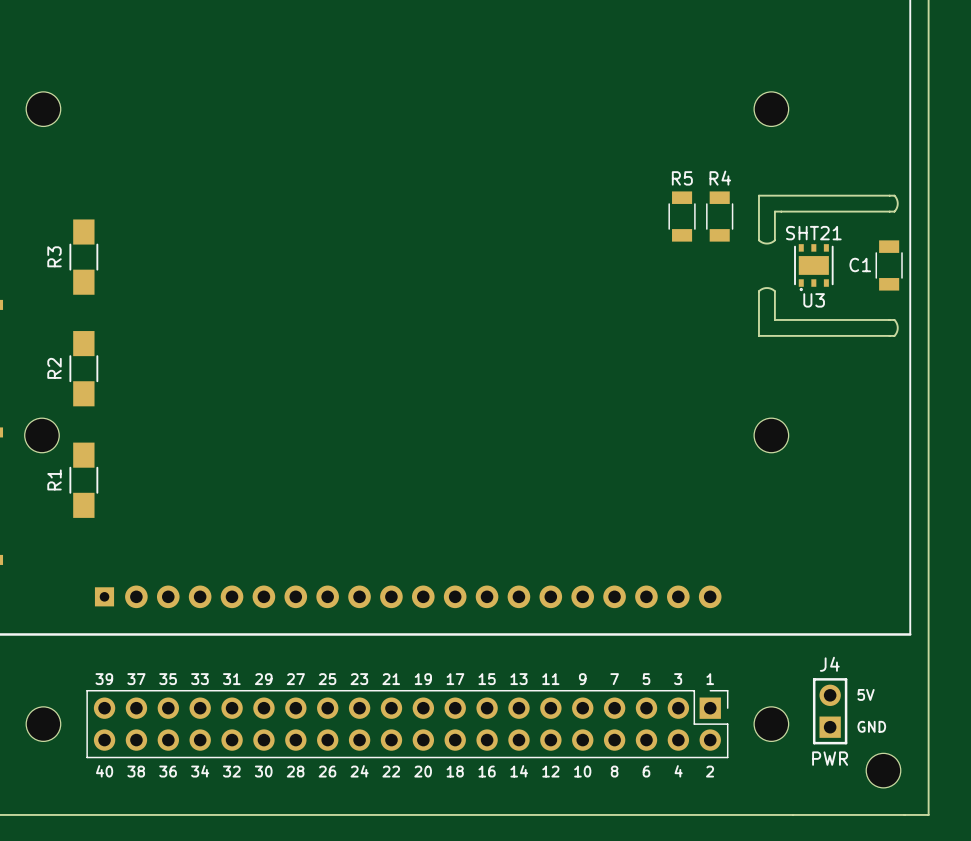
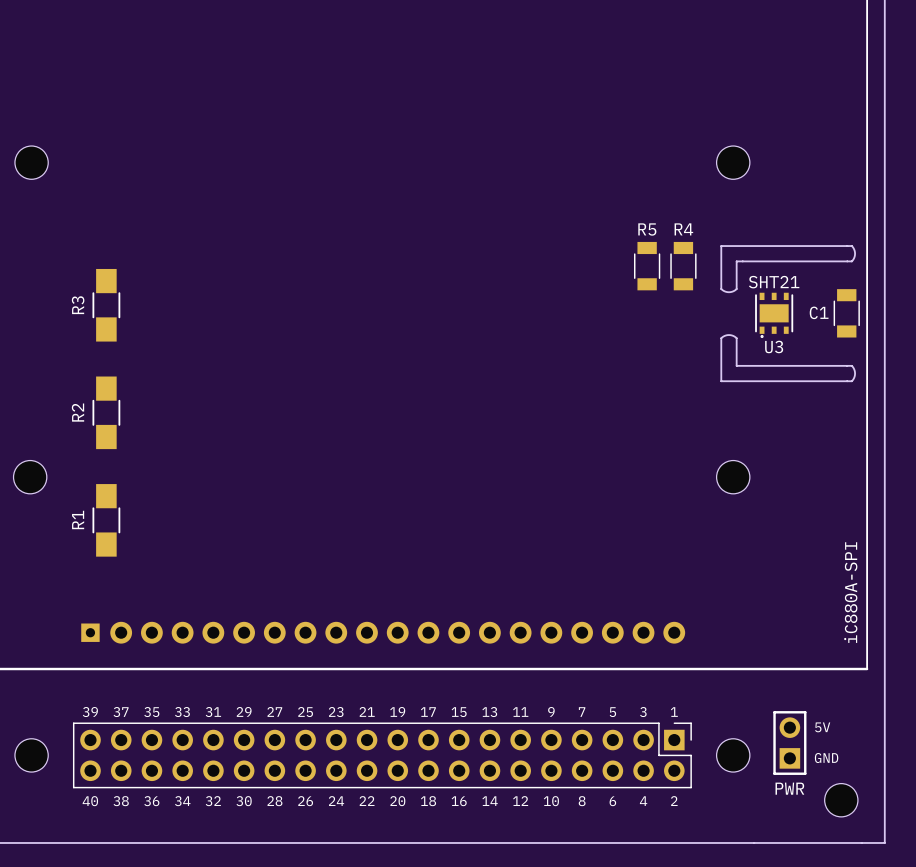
R3 position: (83, 257) -> (106, 305)
R2 position: (83, 368) -> (106, 412)
R1 position: (83, 480) -> (106, 520)
text: none -> iC880A-SPI (850, 592)
J4 name: J4 (829, 664) -> none

